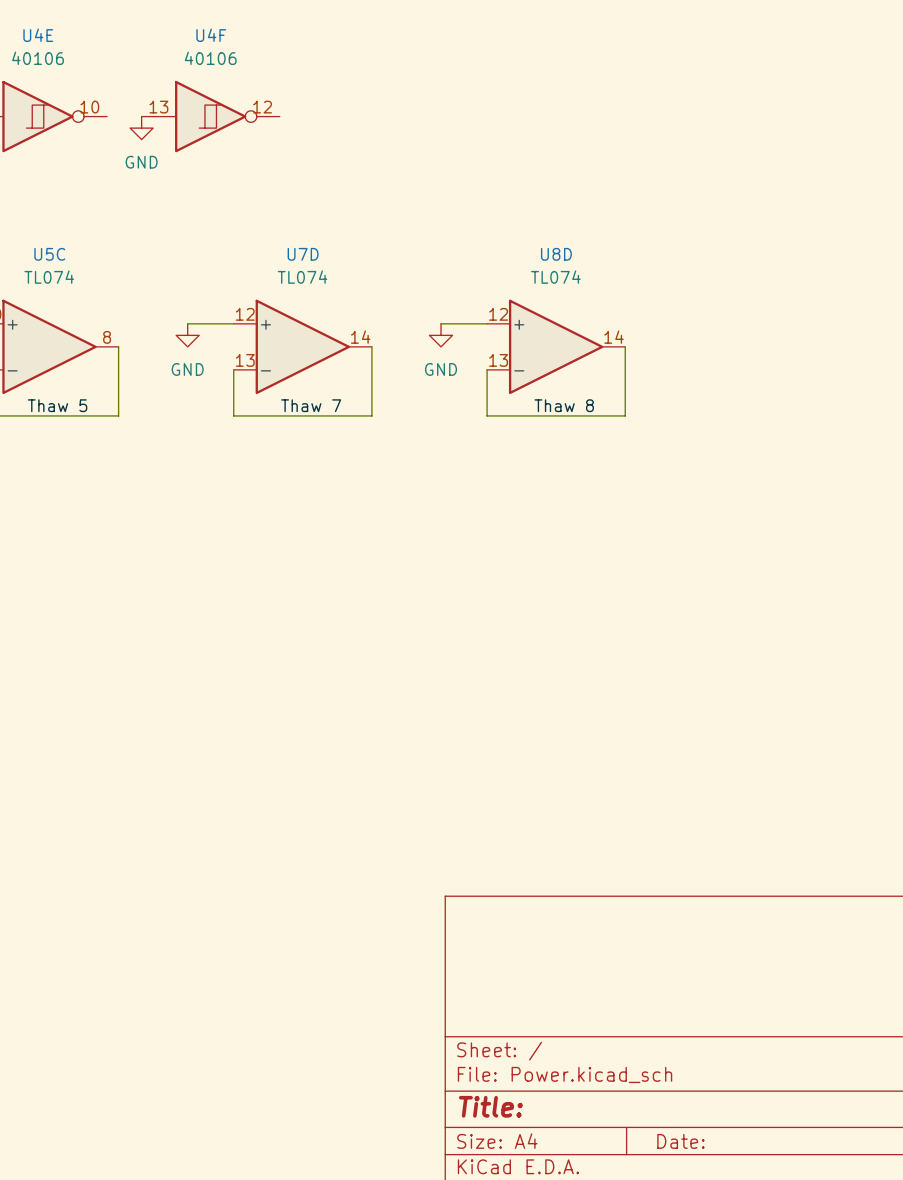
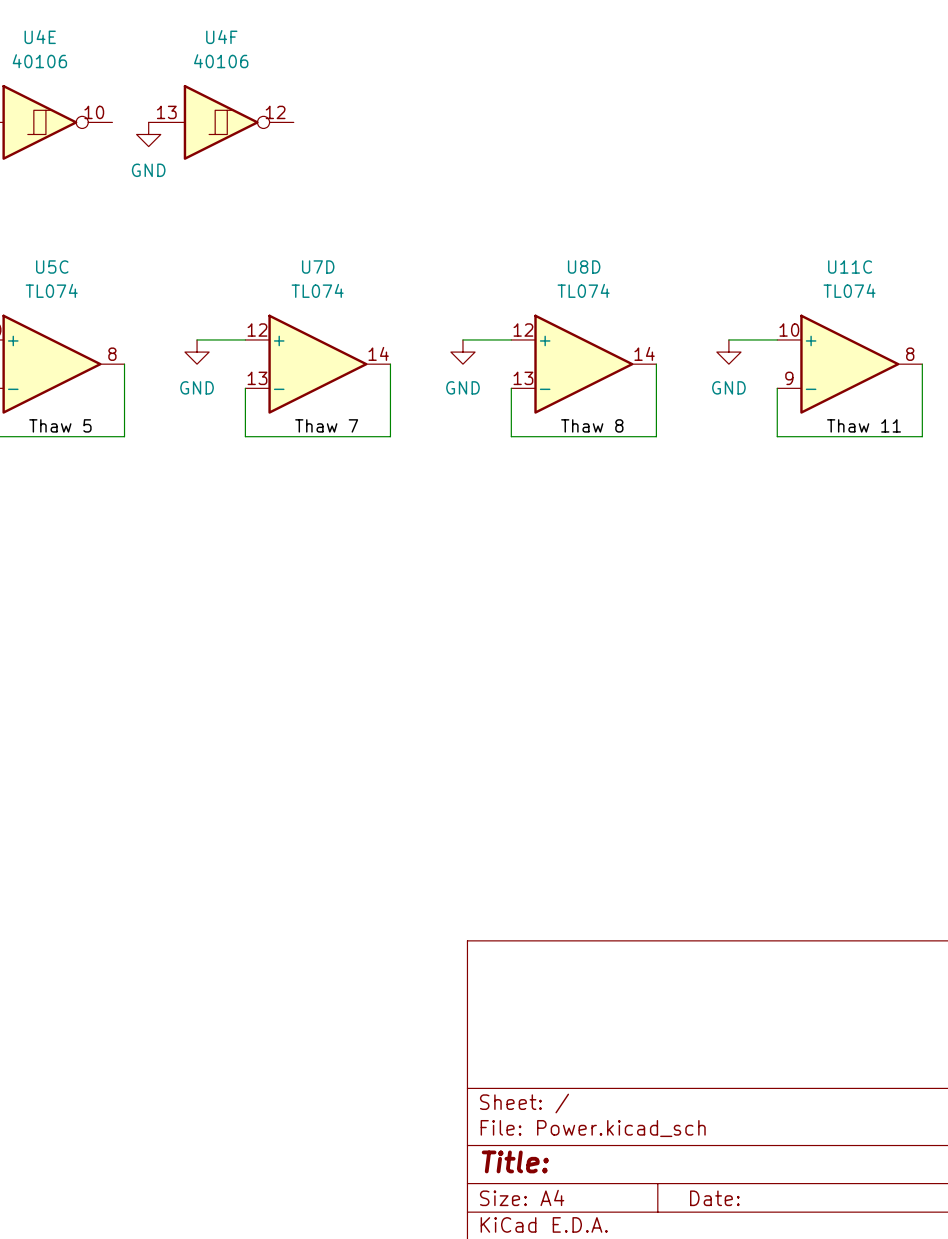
wire: none -> (728, 339) (777, 339)
power symbol: none -> GND (728, 352)
U11C: none -> TL074 (849, 364)
wire: none -> (922, 364) (922, 436) (777, 436) (777, 388)
label: none -> Thaw 11 (864, 425)

